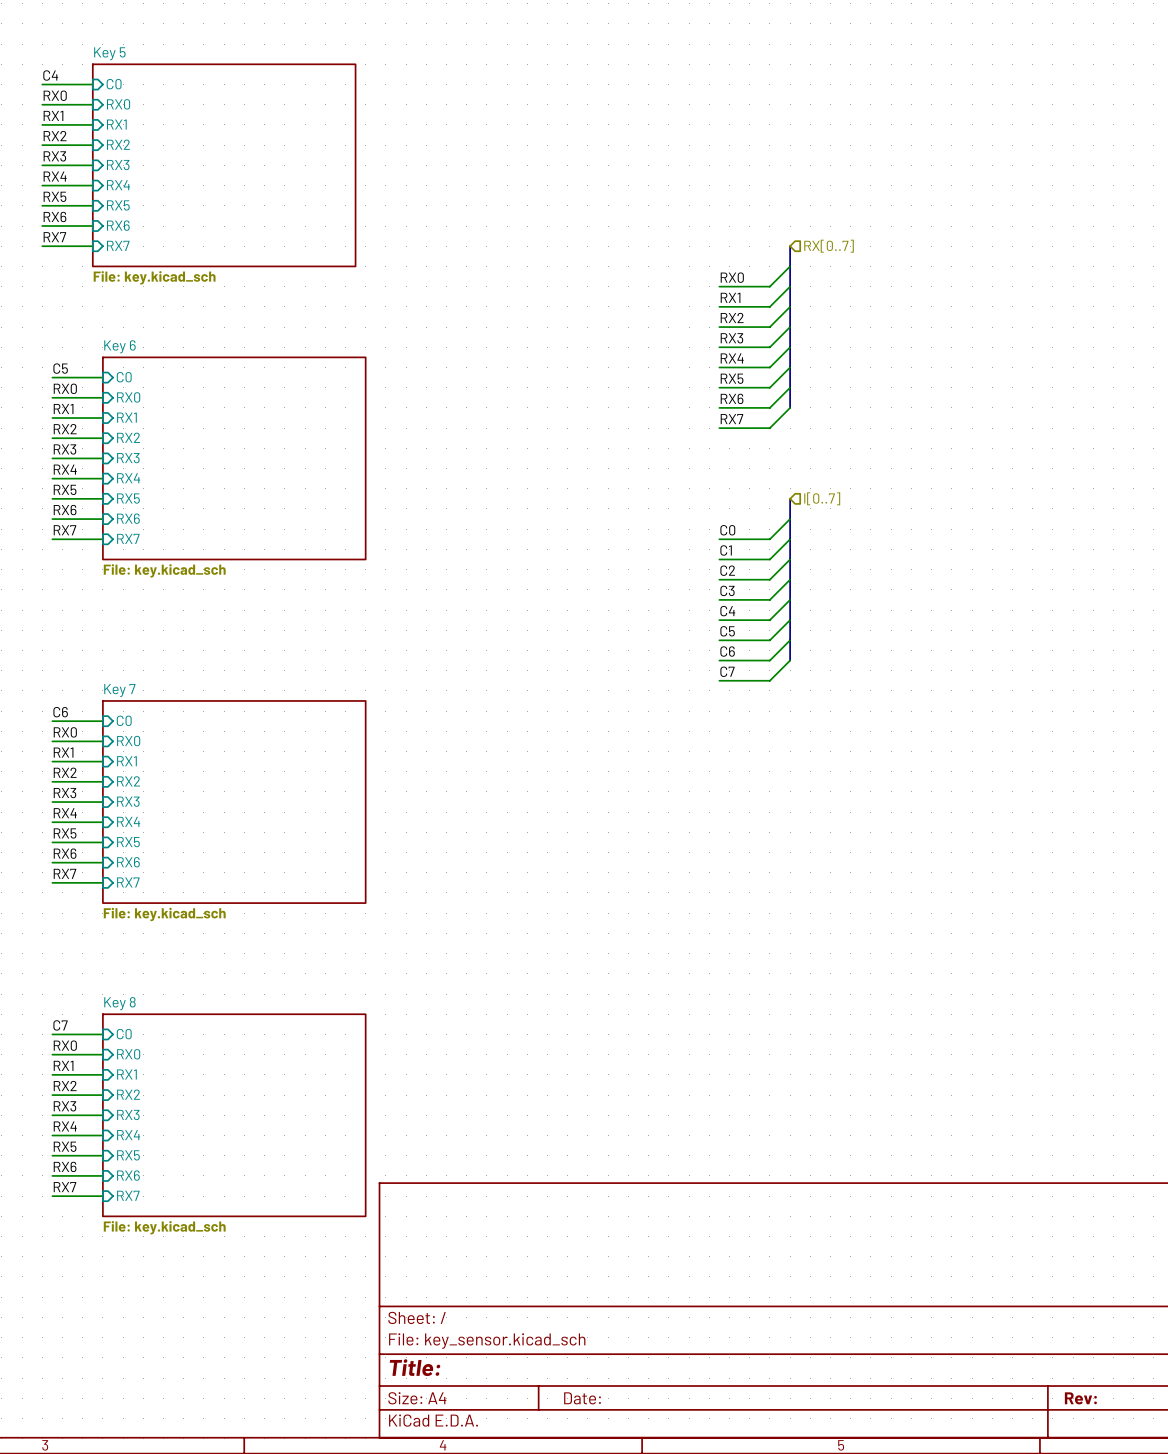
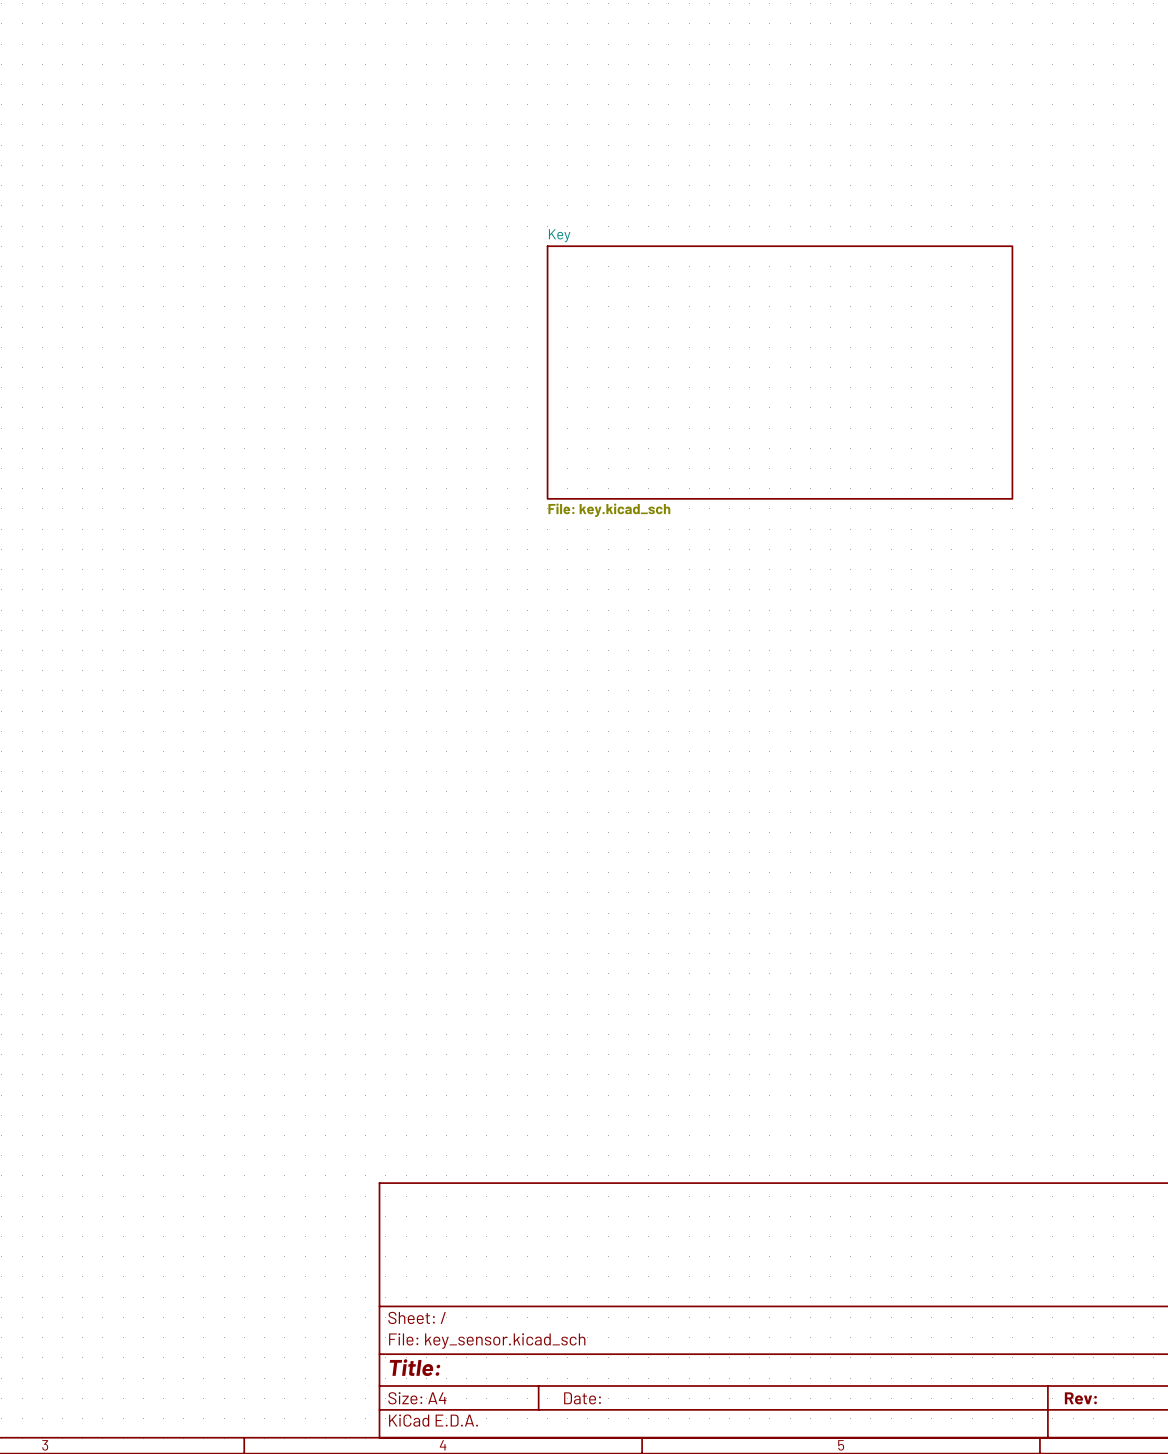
label: C4 (50, 75) -> none
wire: (42, 84) (92, 84) -> none
sheet pin: C0 (114, 84) -> none
label: RX0 (55, 95) -> none
wire: (42, 104) (92, 104) -> none
sheet pin: RX0 (118, 104) -> none
label: RX1 (53, 115) -> none
wire: (42, 124) (92, 124) -> none
sheet pin: RX1 (116, 124) -> none
label: RX2 (55, 136) -> none
sheet pin: RX2 (118, 144) -> none
wire: (42, 145) (92, 145) -> none
label: RX3 (54, 156) -> none
wire: (42, 165) (92, 165) -> none
sheet pin: RX3 (118, 165) -> none
sheet Key 5: File: key.kicad_sch (224, 165) -> none
label: RX4 (55, 176) -> none
wire: (42, 185) (92, 185) -> none
sheet pin: RX4 (118, 185) -> none
label: RX5 (54, 196) -> none
wire: (42, 205) (92, 205) -> none
sheet pin: RX5 (118, 205) -> none
label: RX6 (54, 216) -> none
sheet pin: RX6 (118, 225) -> none
wire: (42, 226) (92, 226) -> none
label: RX7 (54, 237) -> none
sheet pin: RX7 (118, 245) -> none
wire: (42, 246) (92, 246) -> none
bus: (790, 246) (790, 407) -> none
hierarchical label: RX[0..7] (829, 246) -> none
wire: (790, 266) (769, 286) (719, 286) -> none
label: RX0 (732, 277) -> none
wire: (790, 286) (769, 306) (719, 306) -> none
label: RX1 (730, 297) -> none
wire: (790, 306) (769, 327) (719, 327) -> none
label: RX2 (732, 317) -> none
wire: (790, 327) (769, 347) (719, 347) -> none
label: RX3 (731, 338) -> none
wire: (790, 347) (769, 367) (719, 367) -> none
label: RX4 (732, 358) -> none
wire: (790, 367) (769, 387) (719, 387) -> none
label: C5 (60, 368) -> none
sheet Key: none -> File: key.kicad_sch (779, 372)
wire: (52, 377) (102, 377) -> none
sheet pin: C0 (124, 377) -> none
label: RX5 (732, 378) -> none
wire: (790, 387) (769, 407) (719, 407) -> none
label: RX0 (65, 388) -> none
wire: (52, 397) (102, 397) -> none
sheet pin: RX0 (128, 397) -> none
label: RX6 (732, 398) -> none
wire: (790, 407) (769, 428) (719, 428) -> none
label: RX1 (63, 408) -> none
sheet pin: RX1 (126, 417) -> none
wire: (52, 418) (102, 418) -> none
label: RX7 (731, 419) -> none
label: RX2 (65, 429) -> none
sheet pin: RX2 (128, 437) -> none
wire: (52, 438) (102, 438) -> none
label: RX3 (64, 449) -> none
wire: (52, 458) (102, 458) -> none
sheet pin: RX3 (128, 458) -> none
sheet Key 6: File: key.kicad_sch (234, 458) -> none
label: RX4 (65, 469) -> none
wire: (52, 478) (102, 478) -> none
sheet pin: RX4 (128, 478) -> none
label: RX5 (65, 489) -> none
wire: (52, 498) (102, 498) -> none
sheet pin: RX5 (128, 498) -> none
bus: (790, 498) (790, 660) -> none
hierarchical label: I[0..7] (822, 498) -> none
label: RX6 (65, 510) -> none
sheet pin: RX6 (128, 518) -> none
wire: (52, 519) (102, 519) -> none
wire: (790, 519) (769, 539) (719, 539) -> none
label: RX7 (64, 530) -> none
label: C0 (727, 530) -> none
sheet pin: RX7 (128, 538) -> none
wire: (52, 539) (102, 539) -> none
wire: (790, 539) (769, 559) (719, 559) -> none
label: C1 (726, 550) -> none
wire: (790, 559) (769, 579) (719, 579) -> none
label: C2 (727, 570) -> none
wire: (790, 579) (769, 599) (719, 599) -> none
label: C3 (727, 590) -> none
wire: (790, 599) (769, 620) (719, 620) -> none
label: C4 (727, 611) -> none
wire: (790, 620) (769, 640) (719, 640) -> none
label: C5 (727, 631) -> none
wire: (790, 640) (769, 660) (719, 660) -> none
label: C6 (727, 651) -> none
wire: (790, 660) (769, 680) (719, 680) -> none
label: C7 (727, 671) -> none
label: C6 (60, 712) -> none
sheet pin: C0 (124, 720) -> none
wire: (52, 721) (102, 721) -> none
label: RX0 (65, 732) -> none
wire: (52, 741) (102, 741) -> none
sheet pin: RX0 (128, 741) -> none
label: RX1 (63, 752) -> none
wire: (52, 761) (102, 761) -> none
sheet pin: RX1 (126, 761) -> none
label: RX2 (65, 772) -> none
wire: (52, 781) (102, 781) -> none
sheet pin: RX2 (128, 781) -> none
label: RX3 (64, 793) -> none
sheet pin: RX3 (128, 801) -> none
wire: (52, 802) (102, 802) -> none
sheet Key 7: File: key.kicad_sch (234, 802) -> none
label: RX4 (65, 813) -> none
sheet pin: RX4 (128, 821) -> none
wire: (52, 822) (102, 822) -> none
label: RX5 (65, 833) -> none
wire: (52, 842) (102, 842) -> none
sheet pin: RX5 (128, 842) -> none
label: RX6 (65, 853) -> none
wire: (52, 862) (102, 862) -> none
sheet pin: RX6 (128, 862) -> none
label: RX7 (64, 873) -> none
wire: (52, 882) (102, 882) -> none
sheet pin: RX7 (128, 882) -> none
label: C7 (60, 1025) -> none
wire: (52, 1034) (102, 1034) -> none
sheet pin: C0 (124, 1034) -> none
label: RX0 (65, 1045) -> none
wire: (52, 1054) (102, 1054) -> none
sheet pin: RX0 (128, 1054) -> none
label: RX1 (63, 1065) -> none
wire: (52, 1074) (102, 1074) -> none
sheet pin: RX1 (126, 1074) -> none
label: RX2 (65, 1086) -> none
sheet pin: RX2 (128, 1094) -> none
wire: (52, 1095) (102, 1095) -> none
label: RX3 (64, 1106) -> none
sheet pin: RX3 (128, 1114) -> none
wire: (52, 1115) (102, 1115) -> none
sheet Key 8: File: key.kicad_sch (234, 1115) -> none
label: RX4 (65, 1126) -> none
wire: (52, 1135) (102, 1135) -> none
sheet pin: RX4 (128, 1135) -> none
label: RX5 (65, 1146) -> none
wire: (52, 1155) (102, 1155) -> none
sheet pin: RX5 (128, 1155) -> none
label: RX6 (65, 1166) -> none
wire: (52, 1175) (102, 1175) -> none
sheet pin: RX6 (128, 1175) -> none
label: RX7 (64, 1187) -> none
sheet pin: RX7 (128, 1195) -> none
wire: (52, 1196) (102, 1196) -> none

